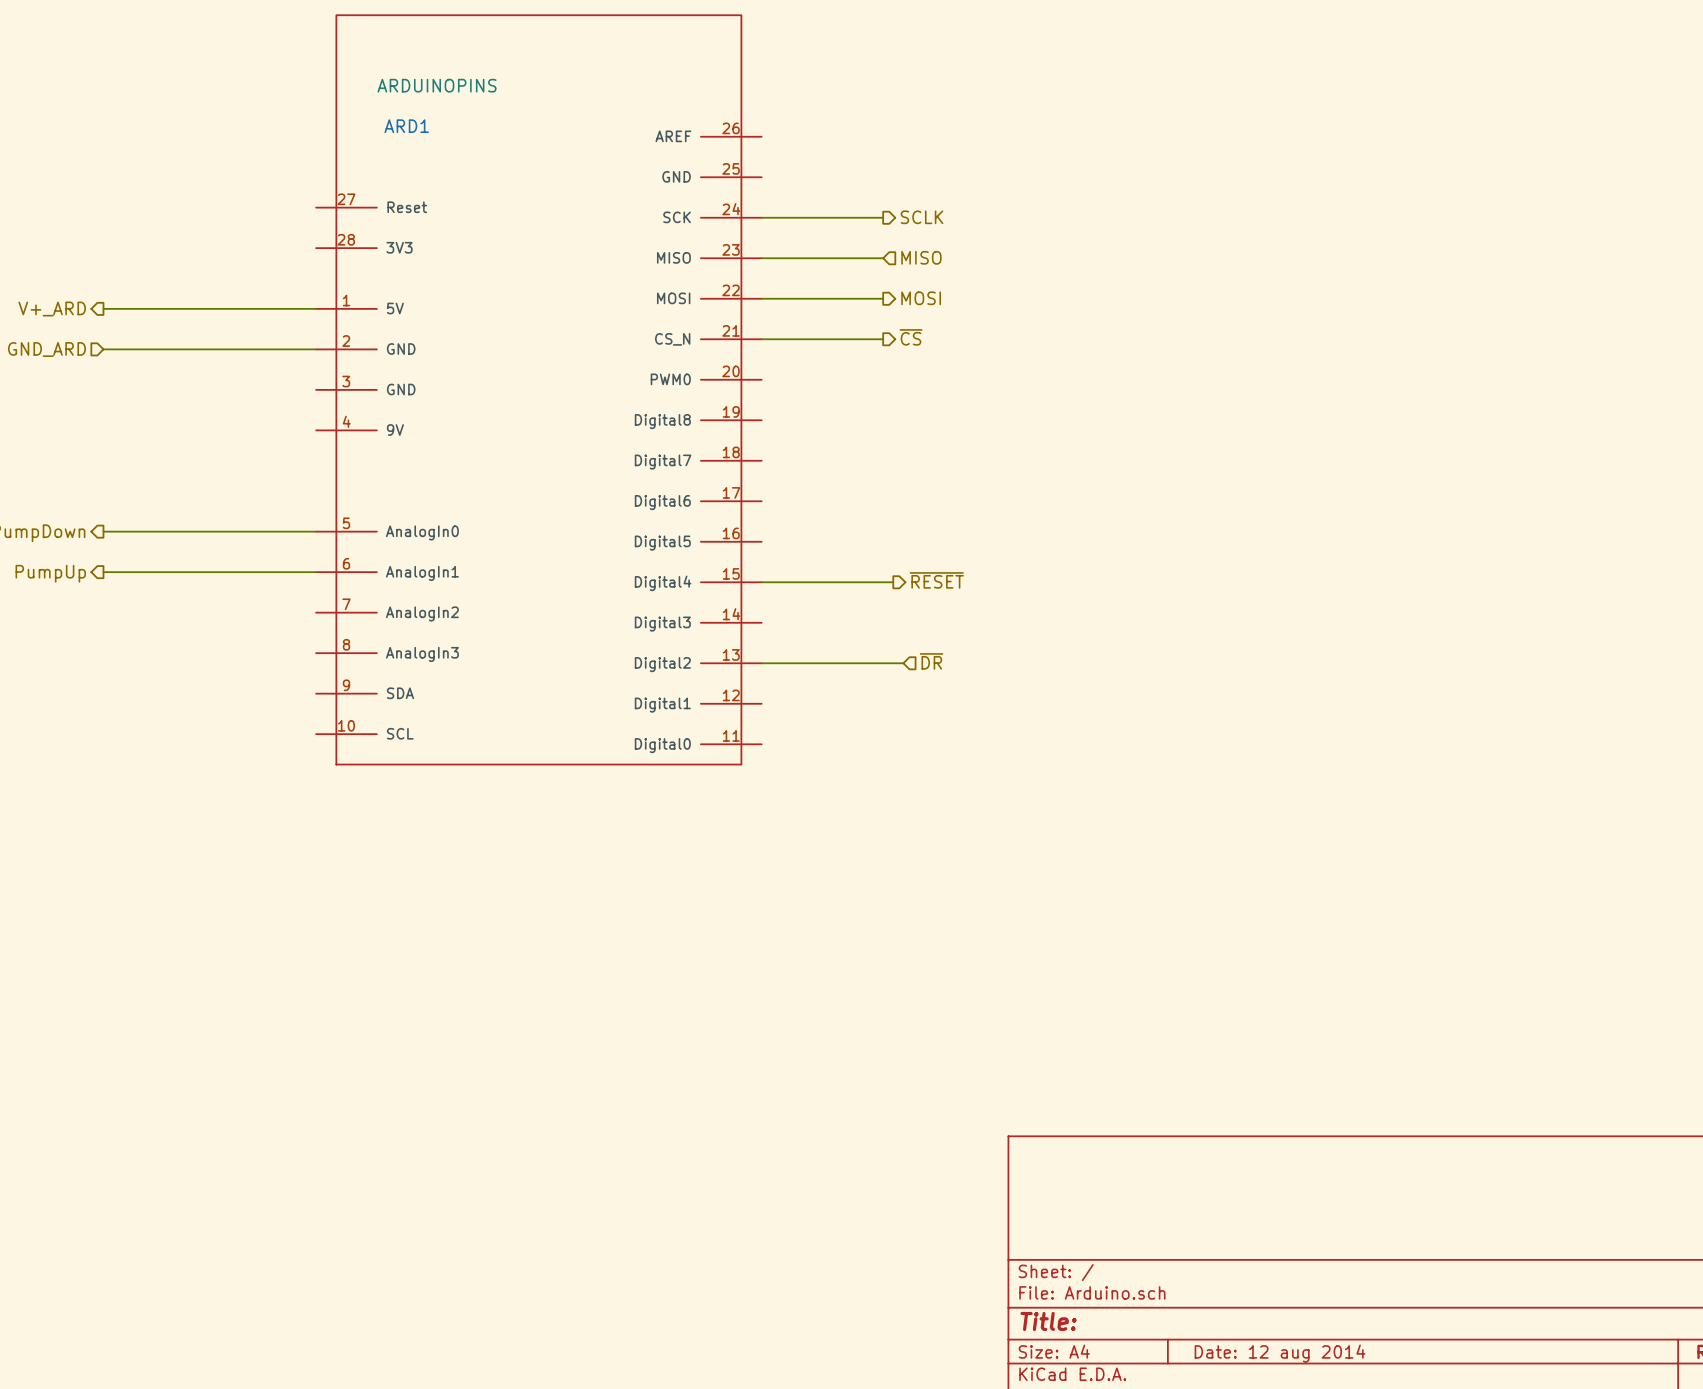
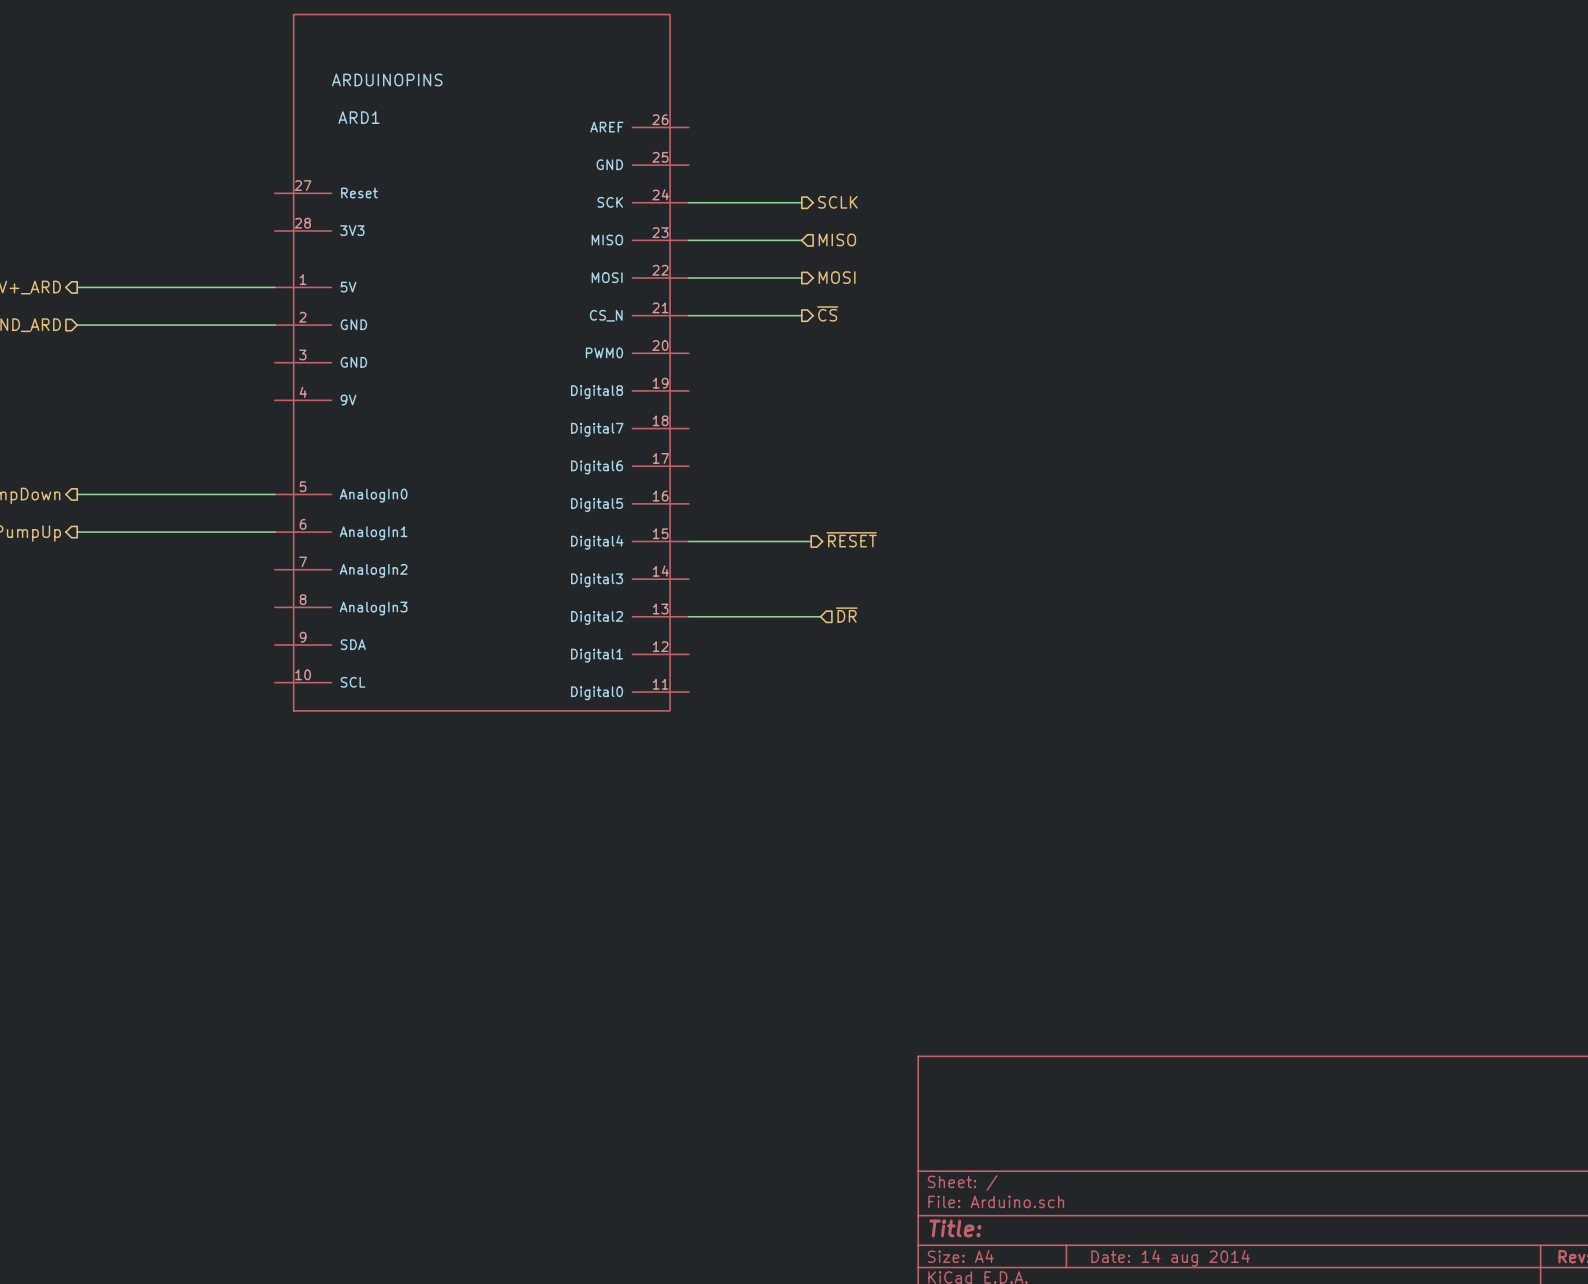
title block: Date: 12 aug 2014 (1280, 1353) -> Date: 14 aug 2014 (1170, 1258)

